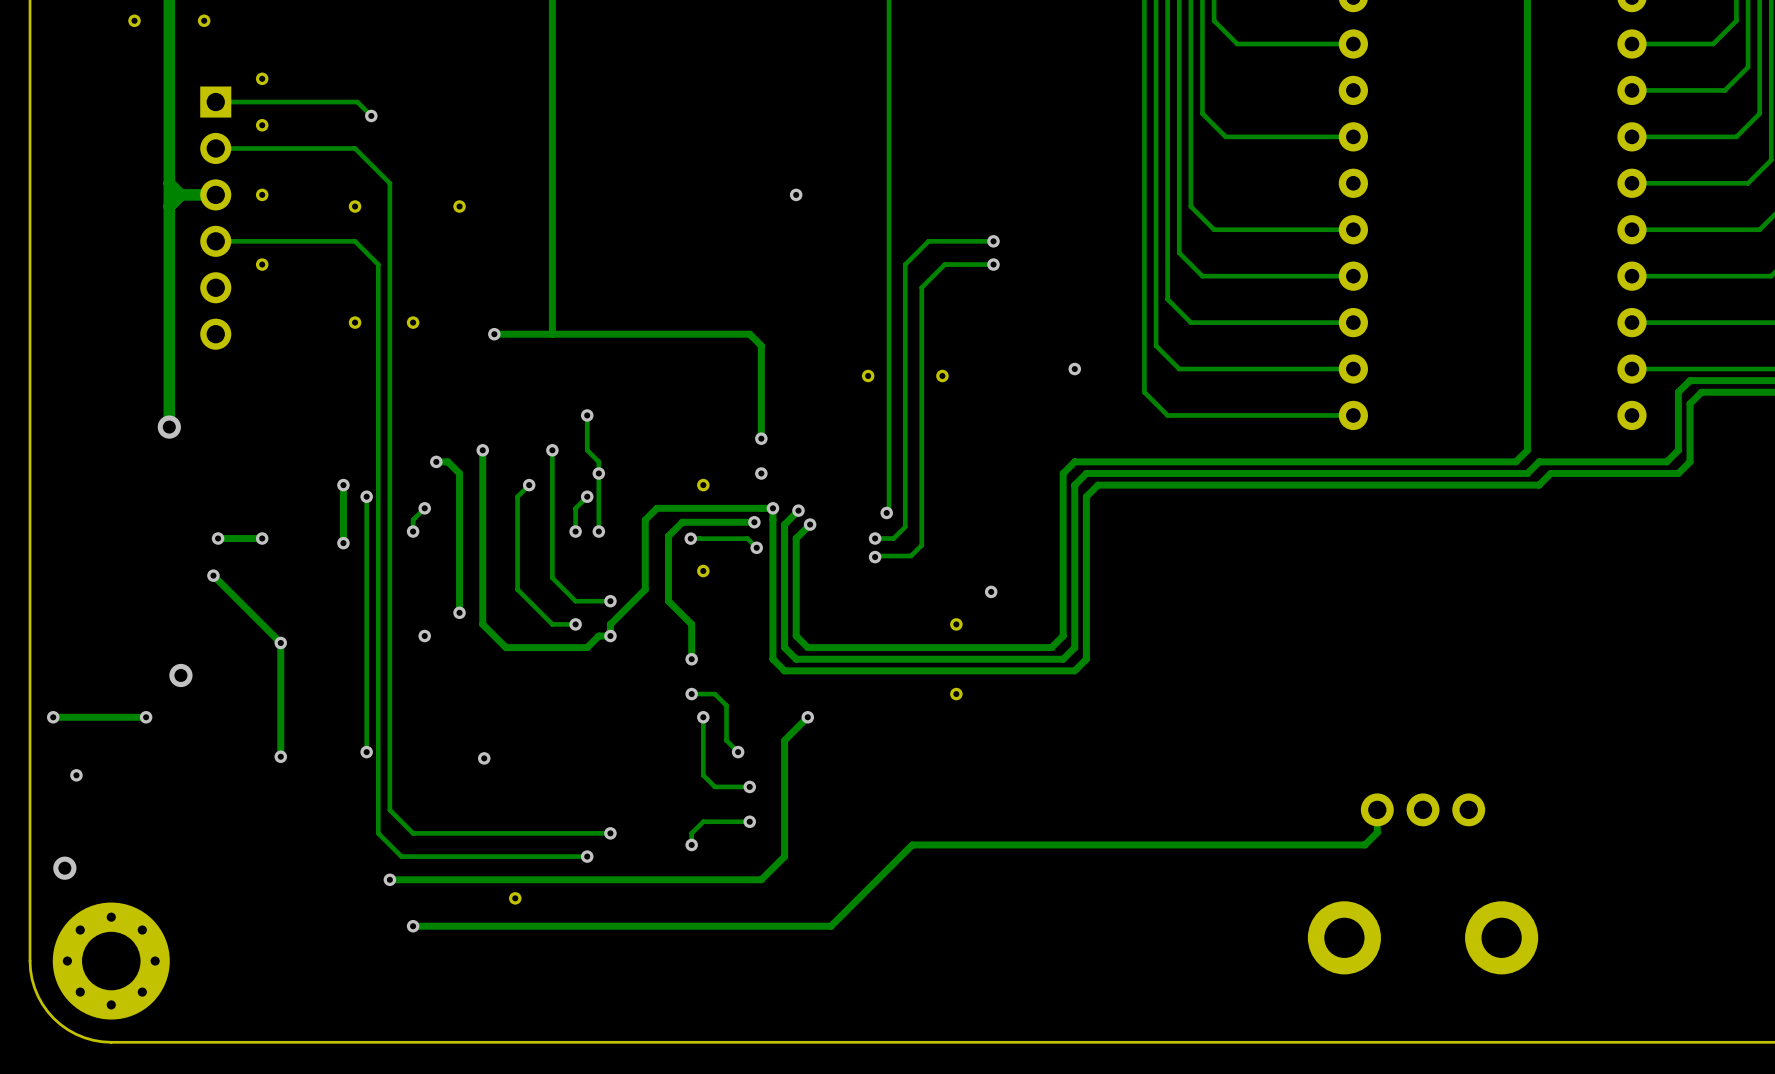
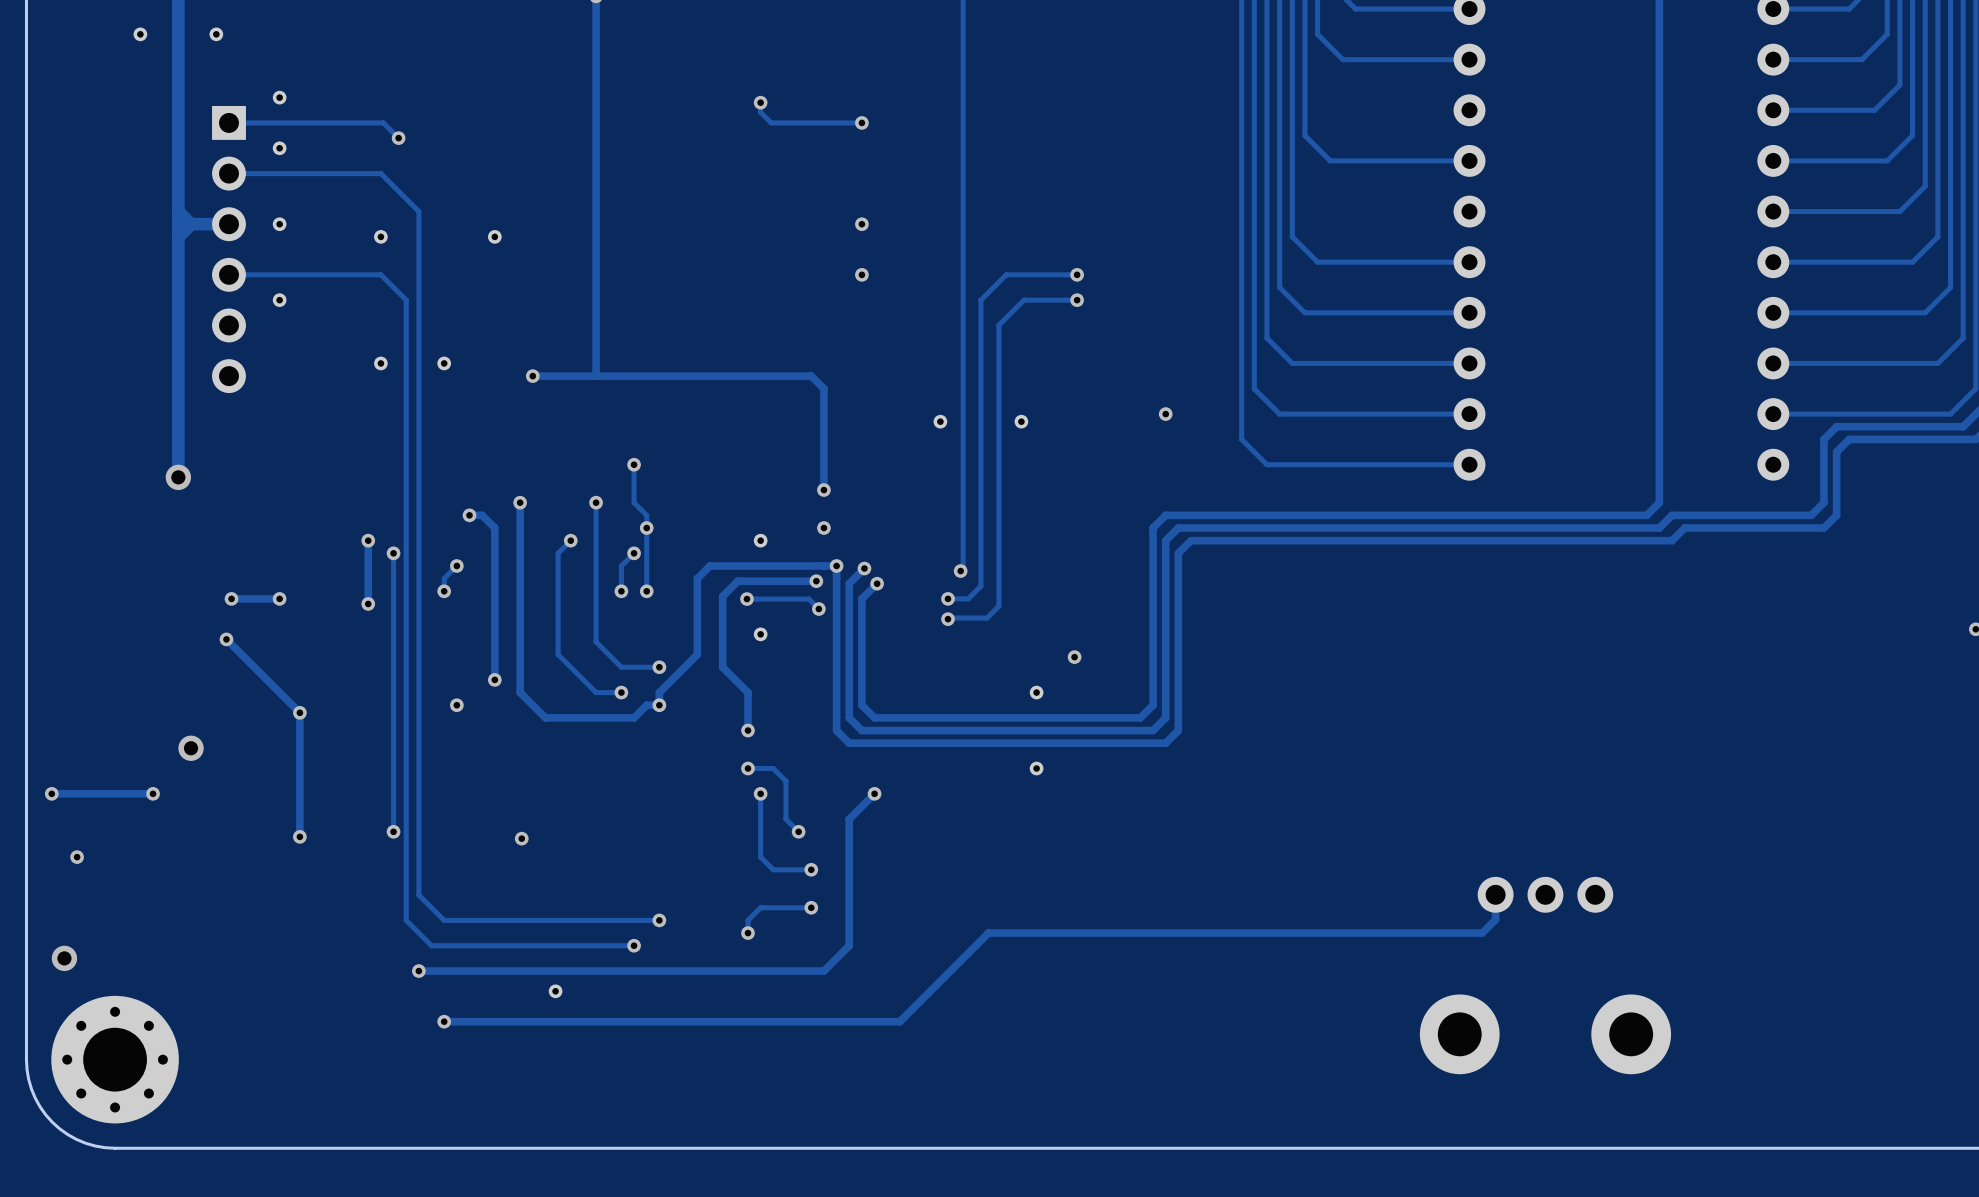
track: none -> (760, 102) (760, 112) (771, 122) (861, 122)
via: none -> (760, 102)
via: none -> (861, 122)
via: none -> (861, 274)

